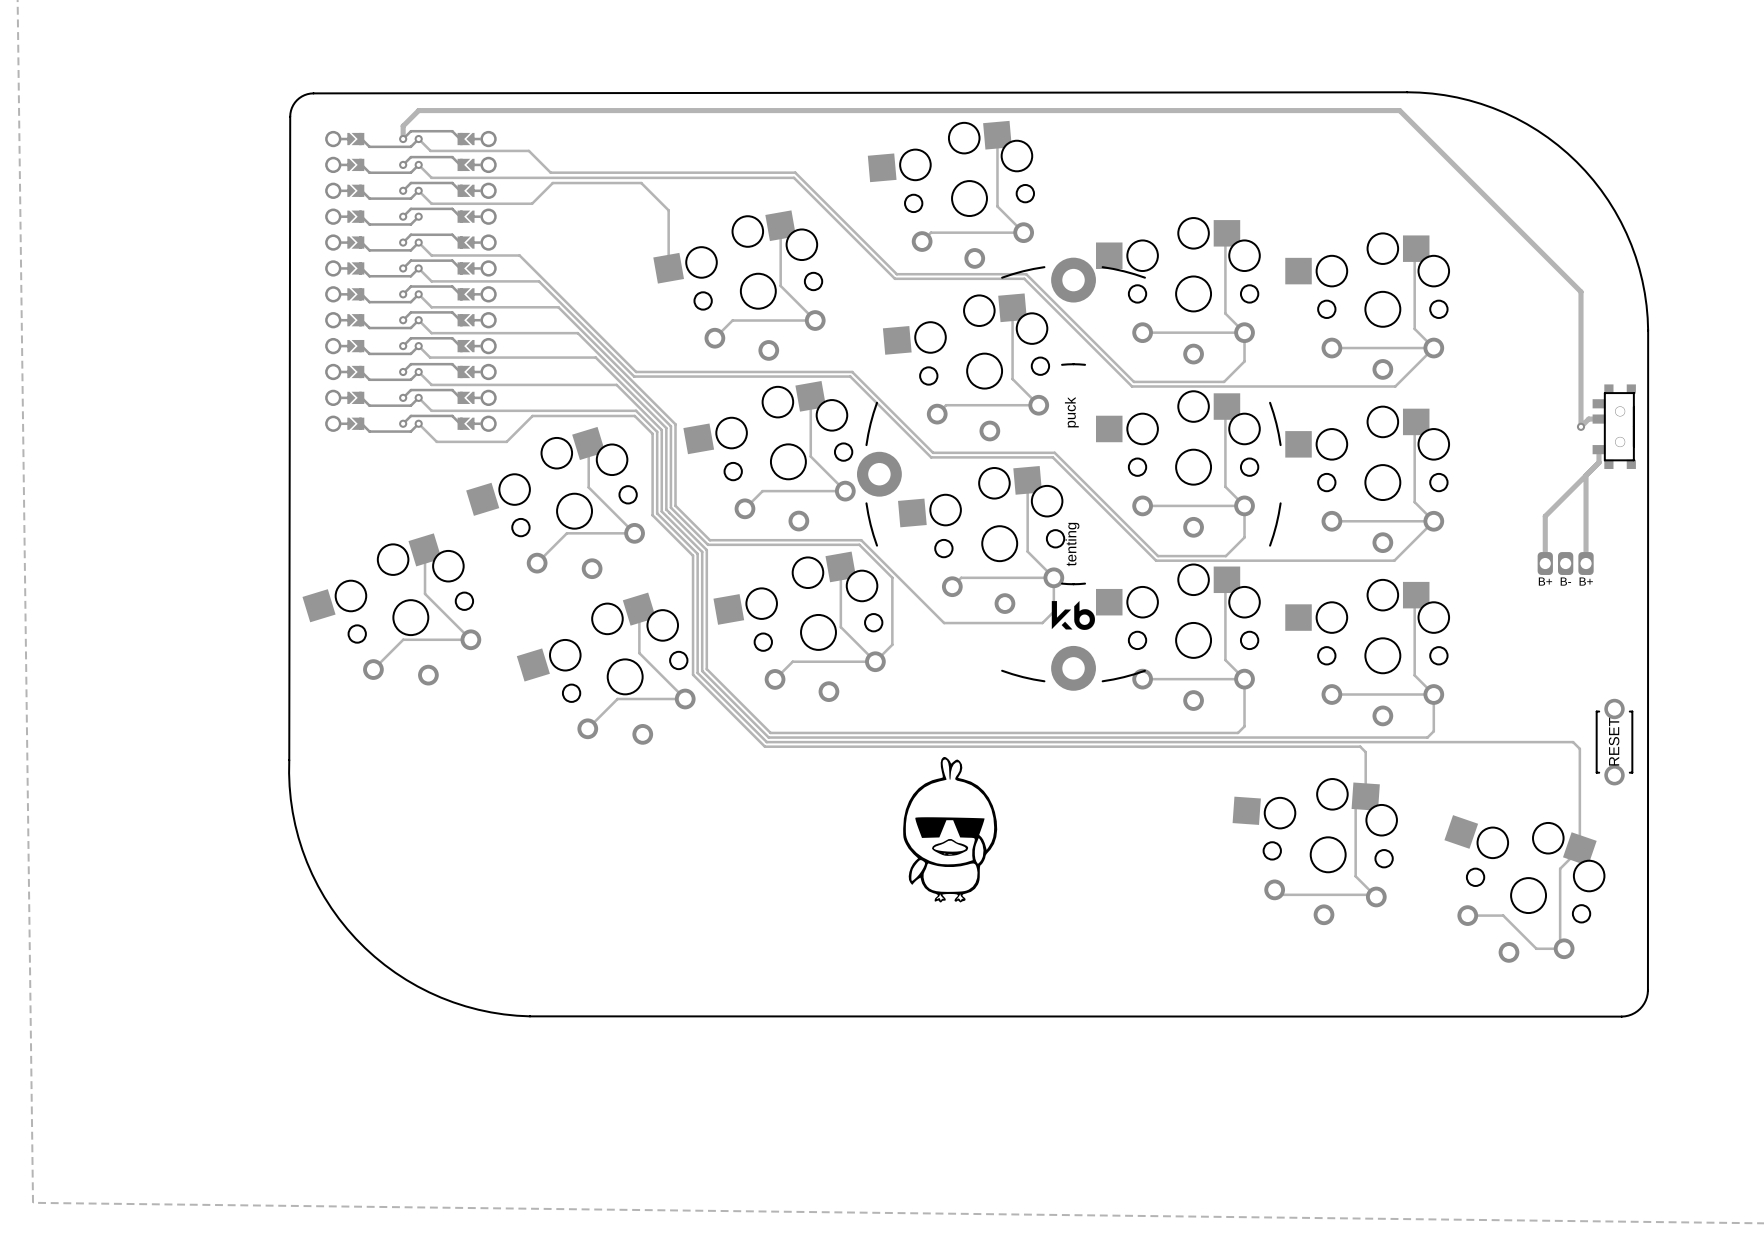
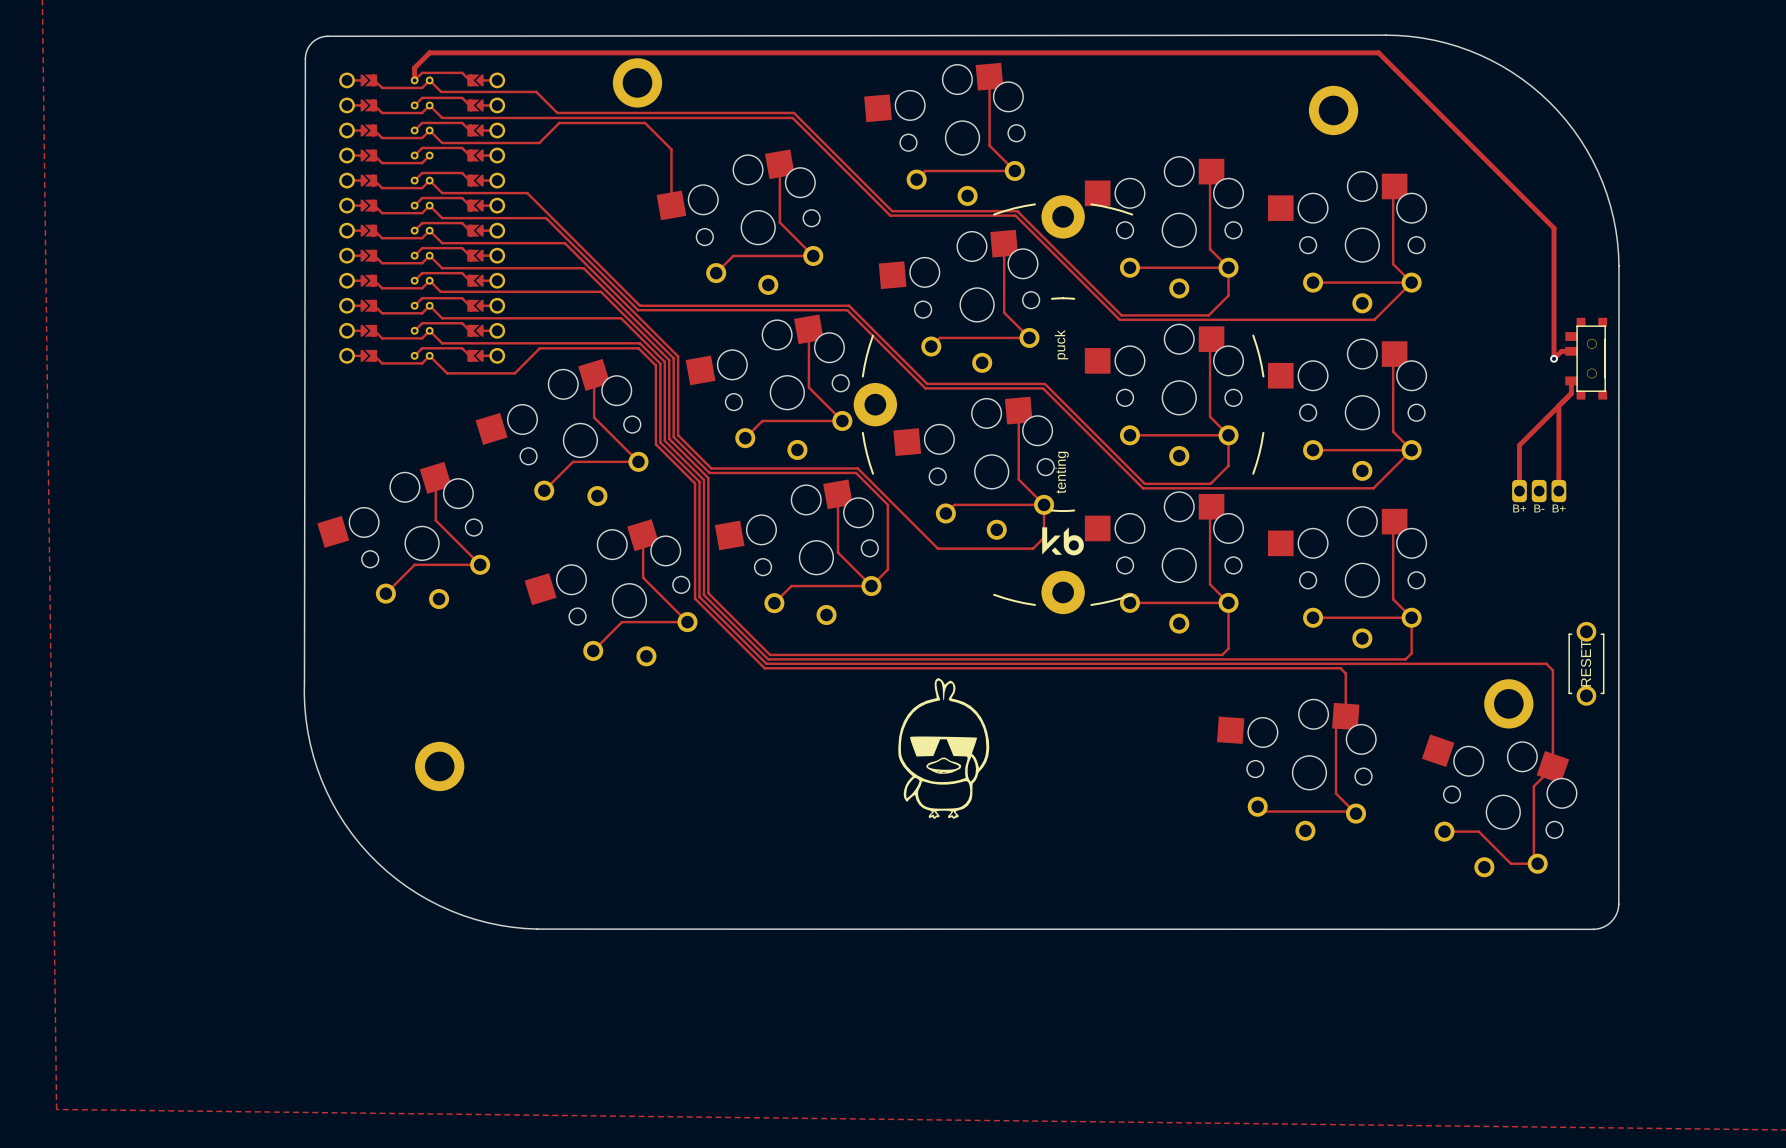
part: none -> (637, 82)
part: none -> (1333, 110)
part: none -> (1508, 703)
part: none -> (439, 766)

